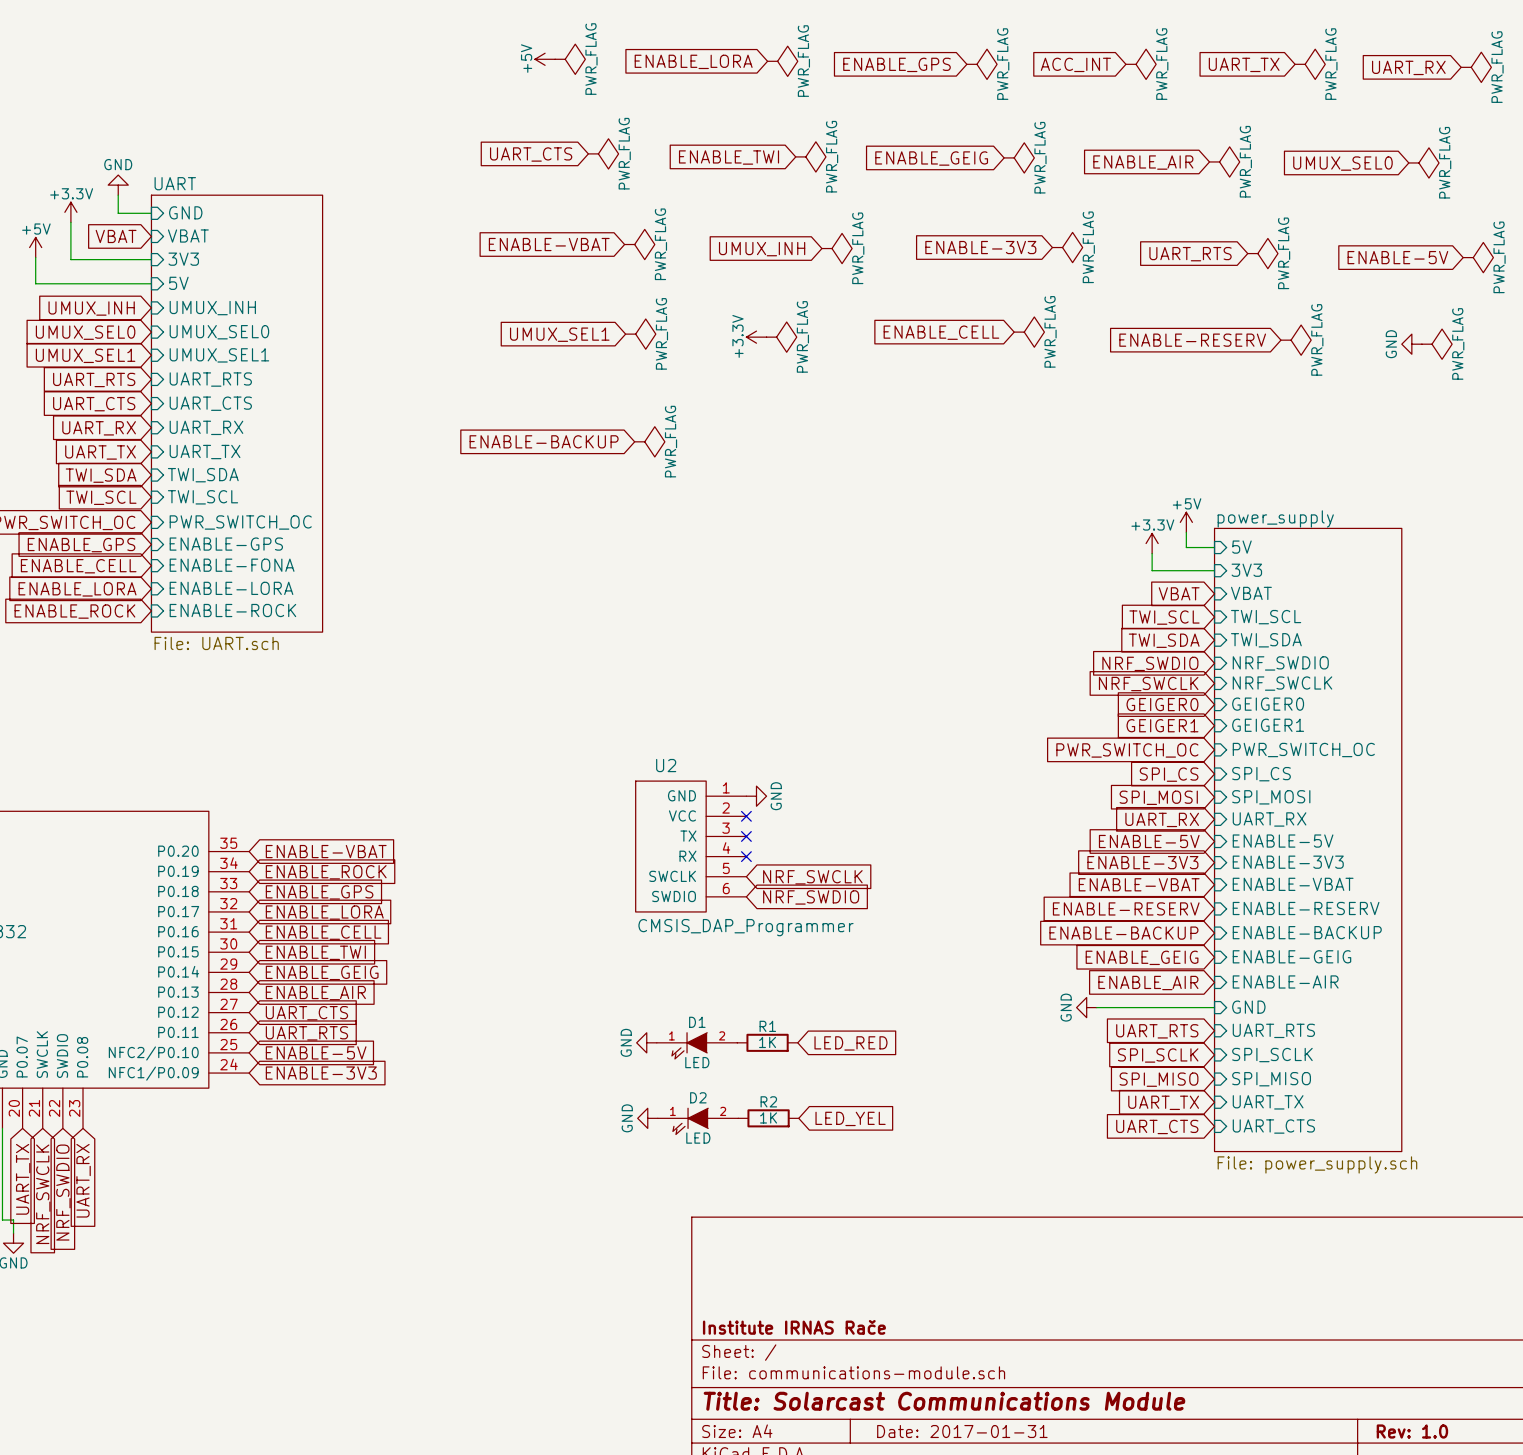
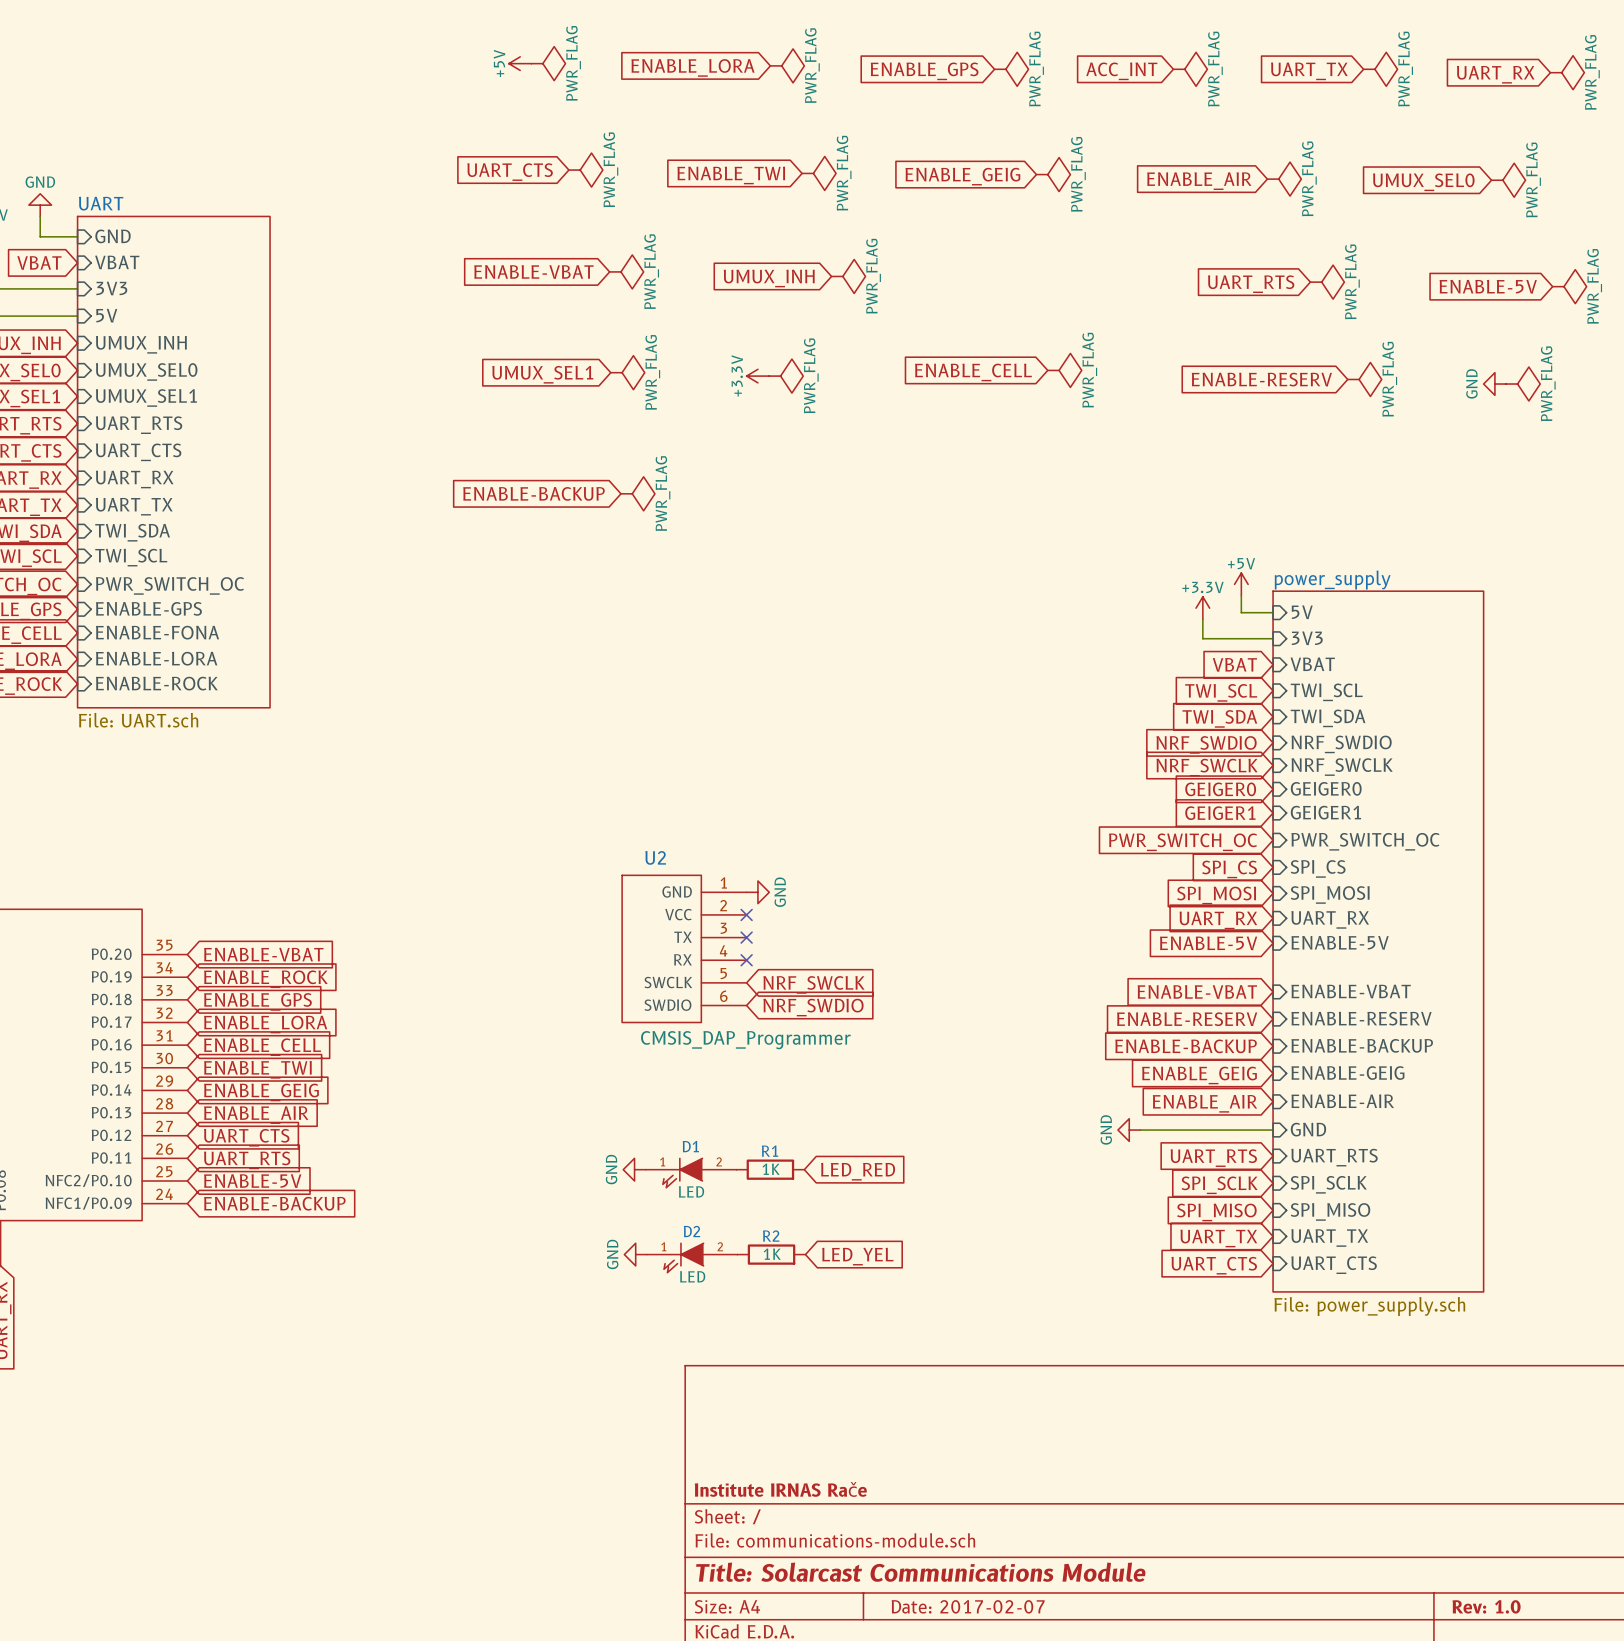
global label: ENABLE-3V3 (980, 247) -> none
power symbol: PWR_FLAG (1067, 247) -> none
global label: ENABLE-3V3 (1142, 862) -> none
sheet pin: ENABLE-3V3 (1288, 862) -> none
global label: ENABLE-3V3 (321, 1073) -> ENABLE-BACKUP (274, 1203)
title block: Date: 2017-01-31 (962, 1431) -> Date: 2017-02-07 (968, 1606)

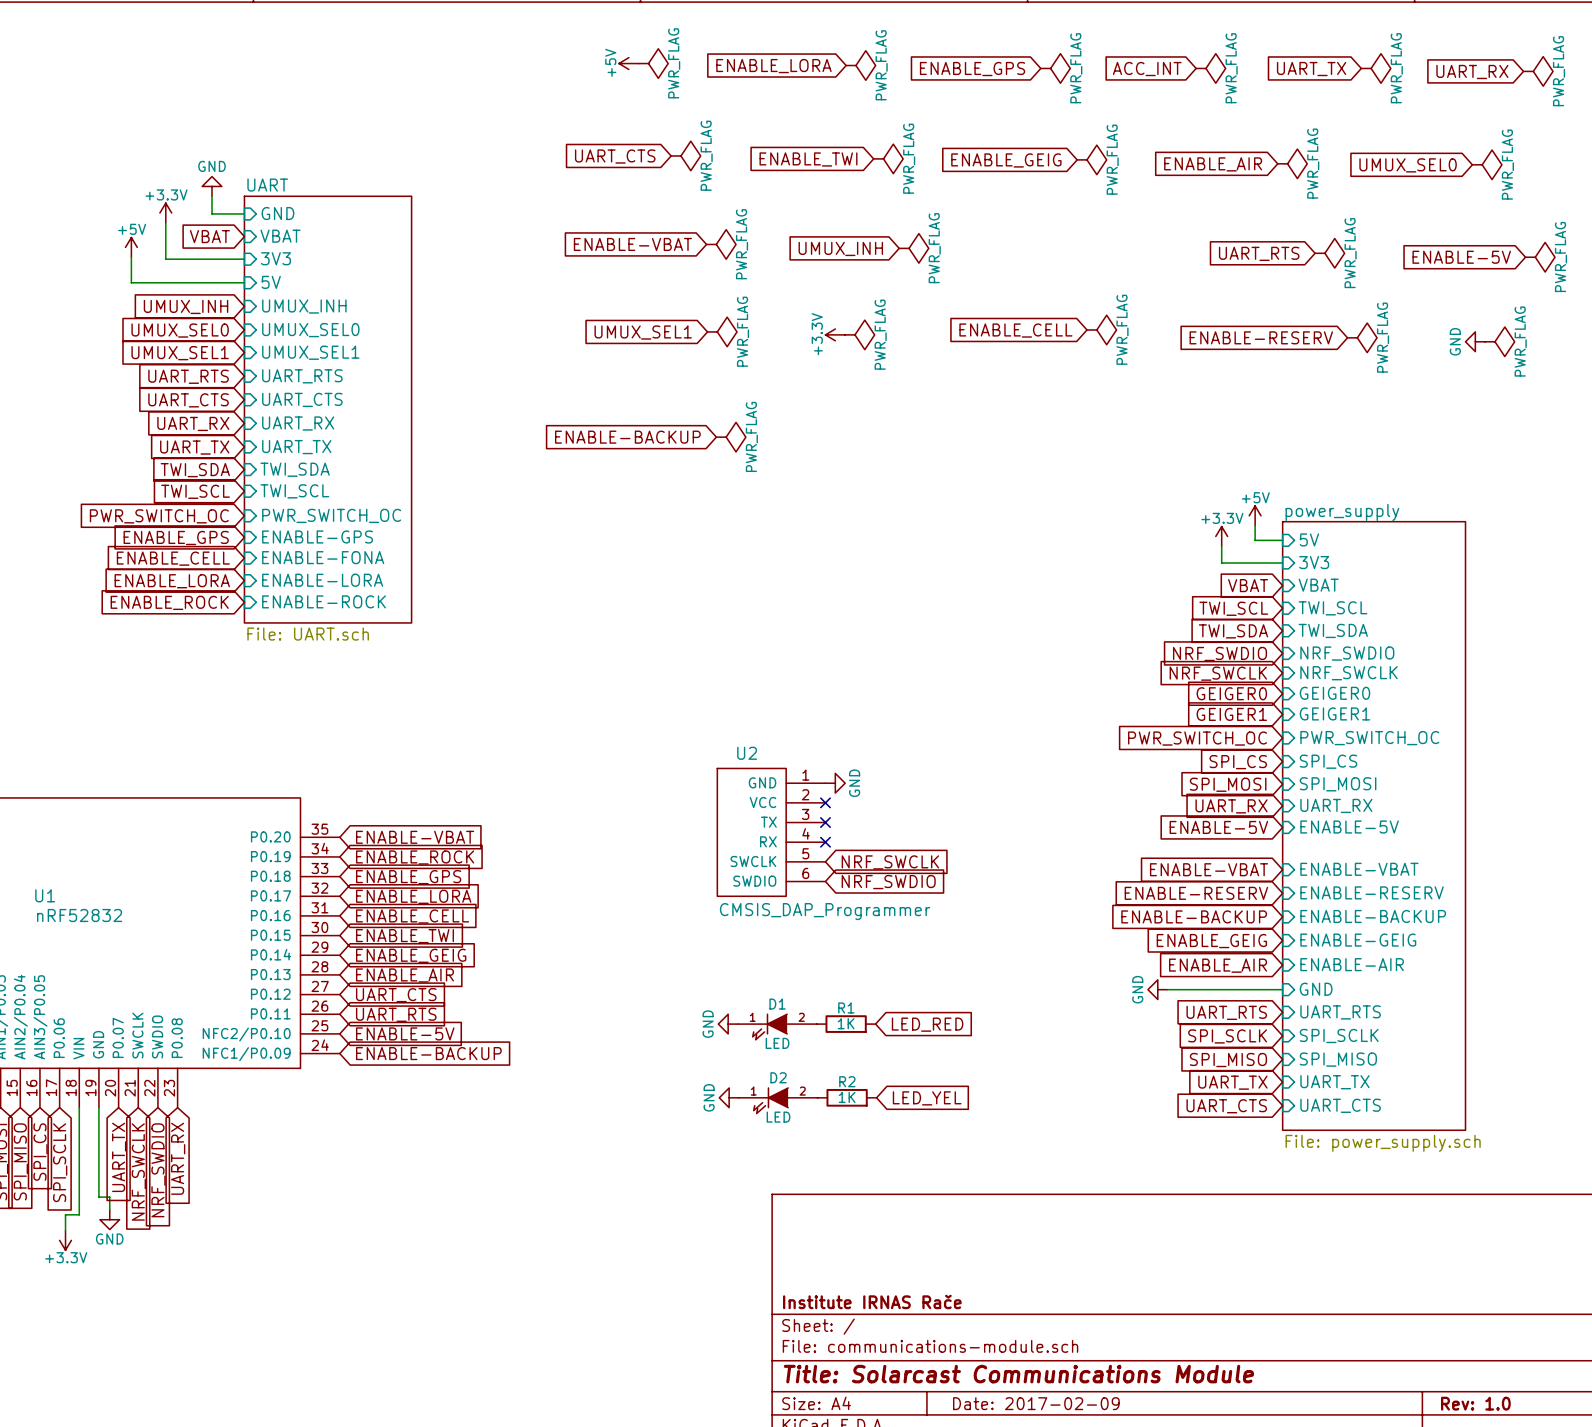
title block: Date: 2017-02-07 (968, 1606) -> Date: 2017-02-09 (1036, 1403)

